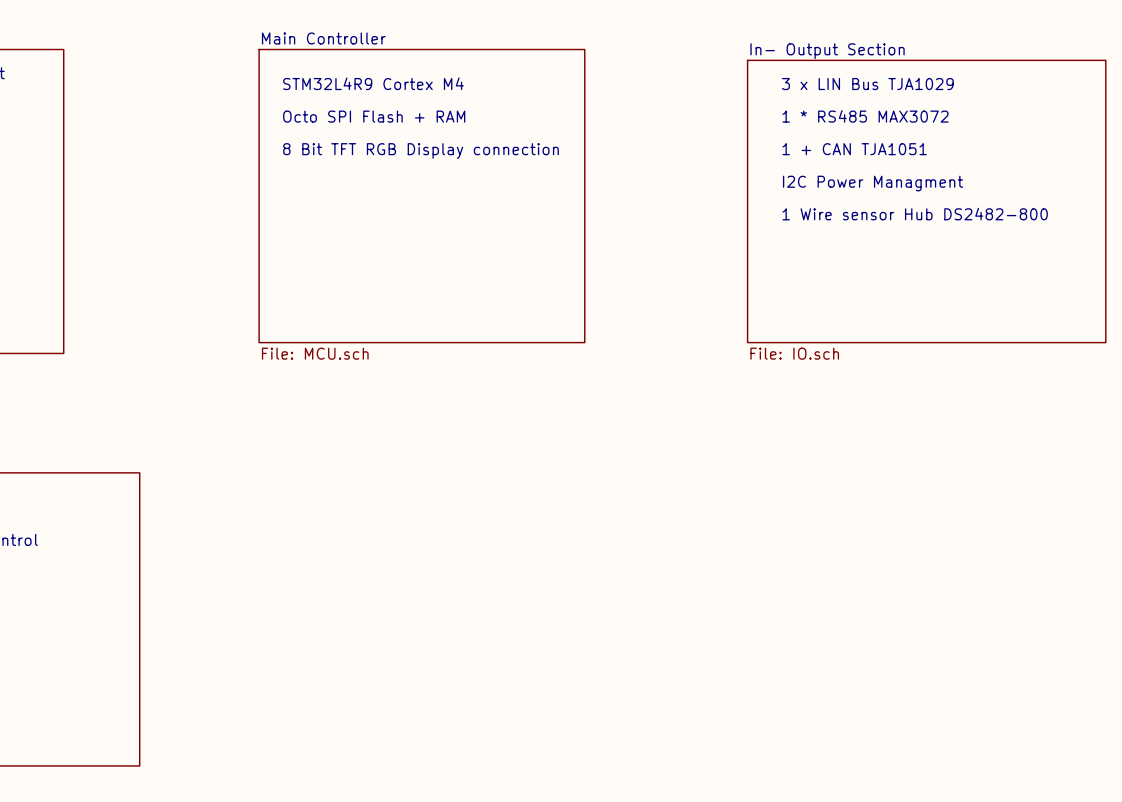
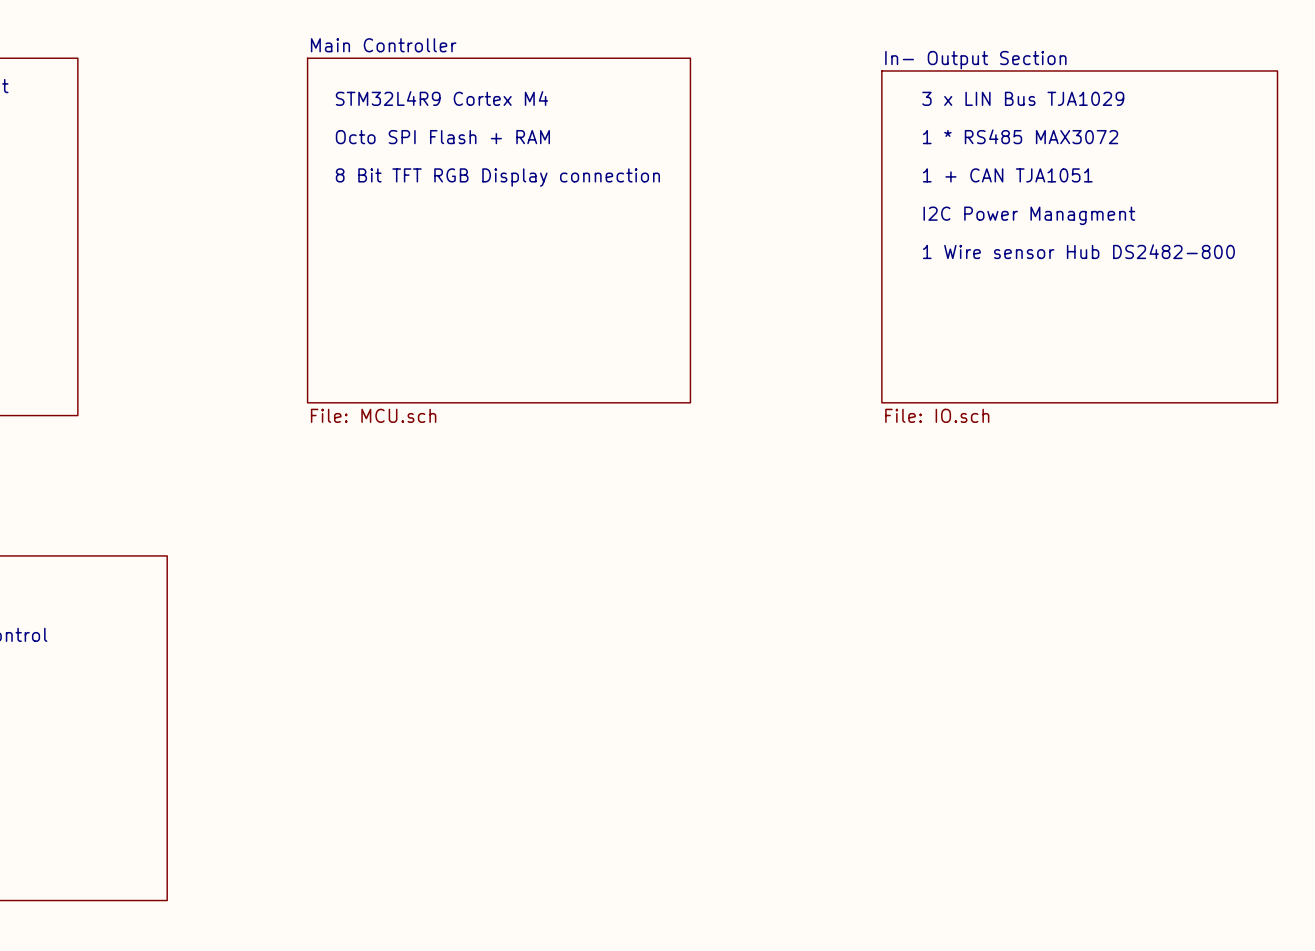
sheet In- Output Section: none -> File: IO.sch (1079, 236)
sheet In- Output Section: File: IO.sch (926, 201) -> none

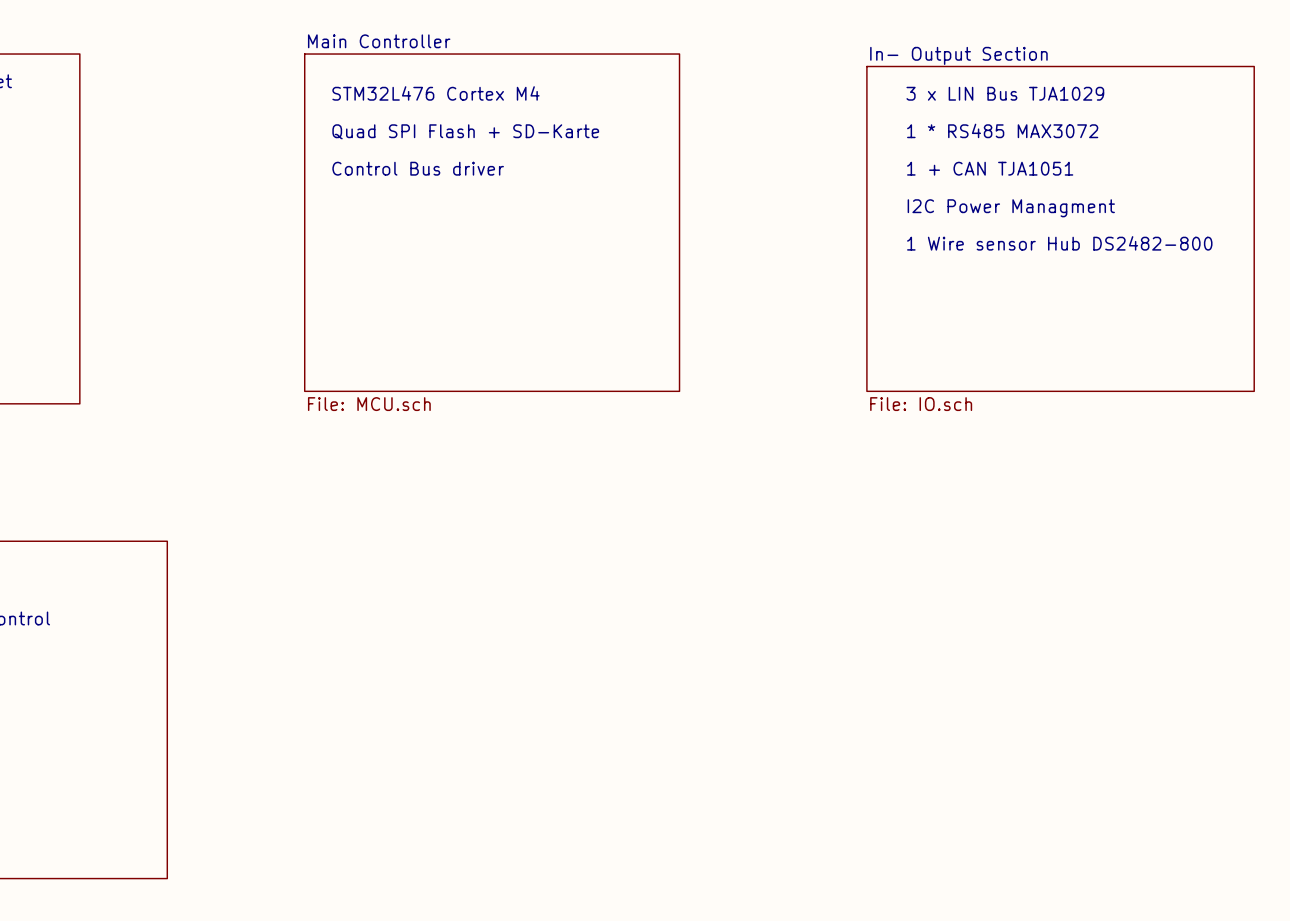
text: STM32L4R9 Cortex M4 (441, 98) -> STM32L476 Cortex M4 (435, 93)
text: Octo SPI Flash + RAM (442, 137) -> Quad SPI Flash + SD-Karte (465, 131)
text: 8 Bit TFT RGB Display connection (497, 177) -> Control Bus driver (418, 168)

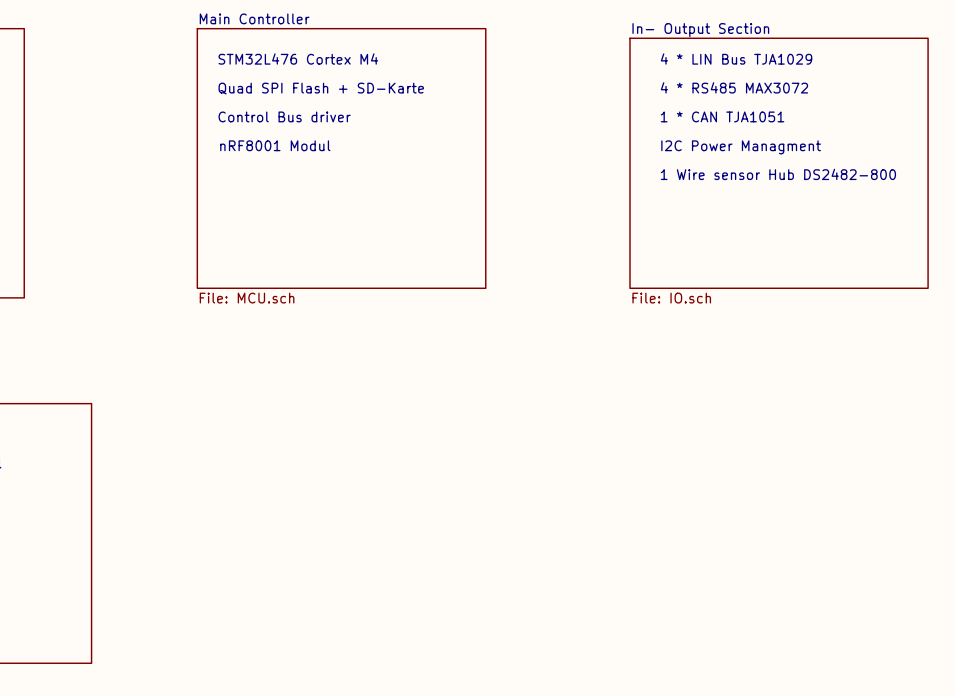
text: 3 x LIN Bus TJA1029 (1005, 93) -> 4 * LIN Bus TJA1029 (736, 59)
text: 1 * RS485 MAX3072 (1002, 130) -> 4 * RS485 MAX3072 (734, 87)
text: 1 + CAN TJA1051 (990, 168) -> 1 * CAN TJA1051 (722, 116)
text: none -> nRF8001 Modul (275, 145)

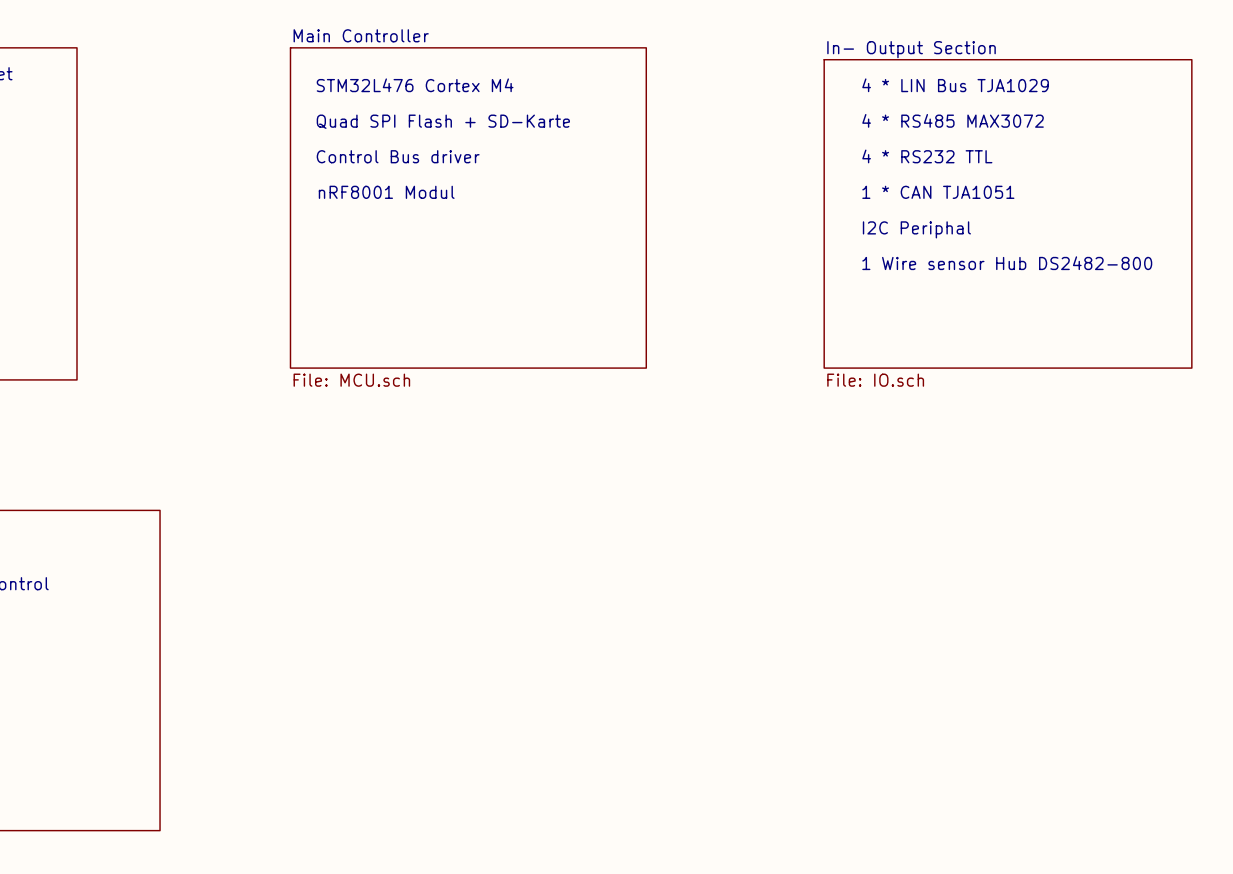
text: 1 * CAN TJA1051 (722, 116) -> 4 * RS232 TTL (927, 156)
text: I2C Power Managment (741, 147) -> 1 * CAN TJA1051 (938, 192)
text: 1 Wire sensor Hub DS2482-800 (778, 174) -> I2C Periphal (916, 229)
text: none -> 1 Wire sensor Hub DS2482-800 (1007, 263)

